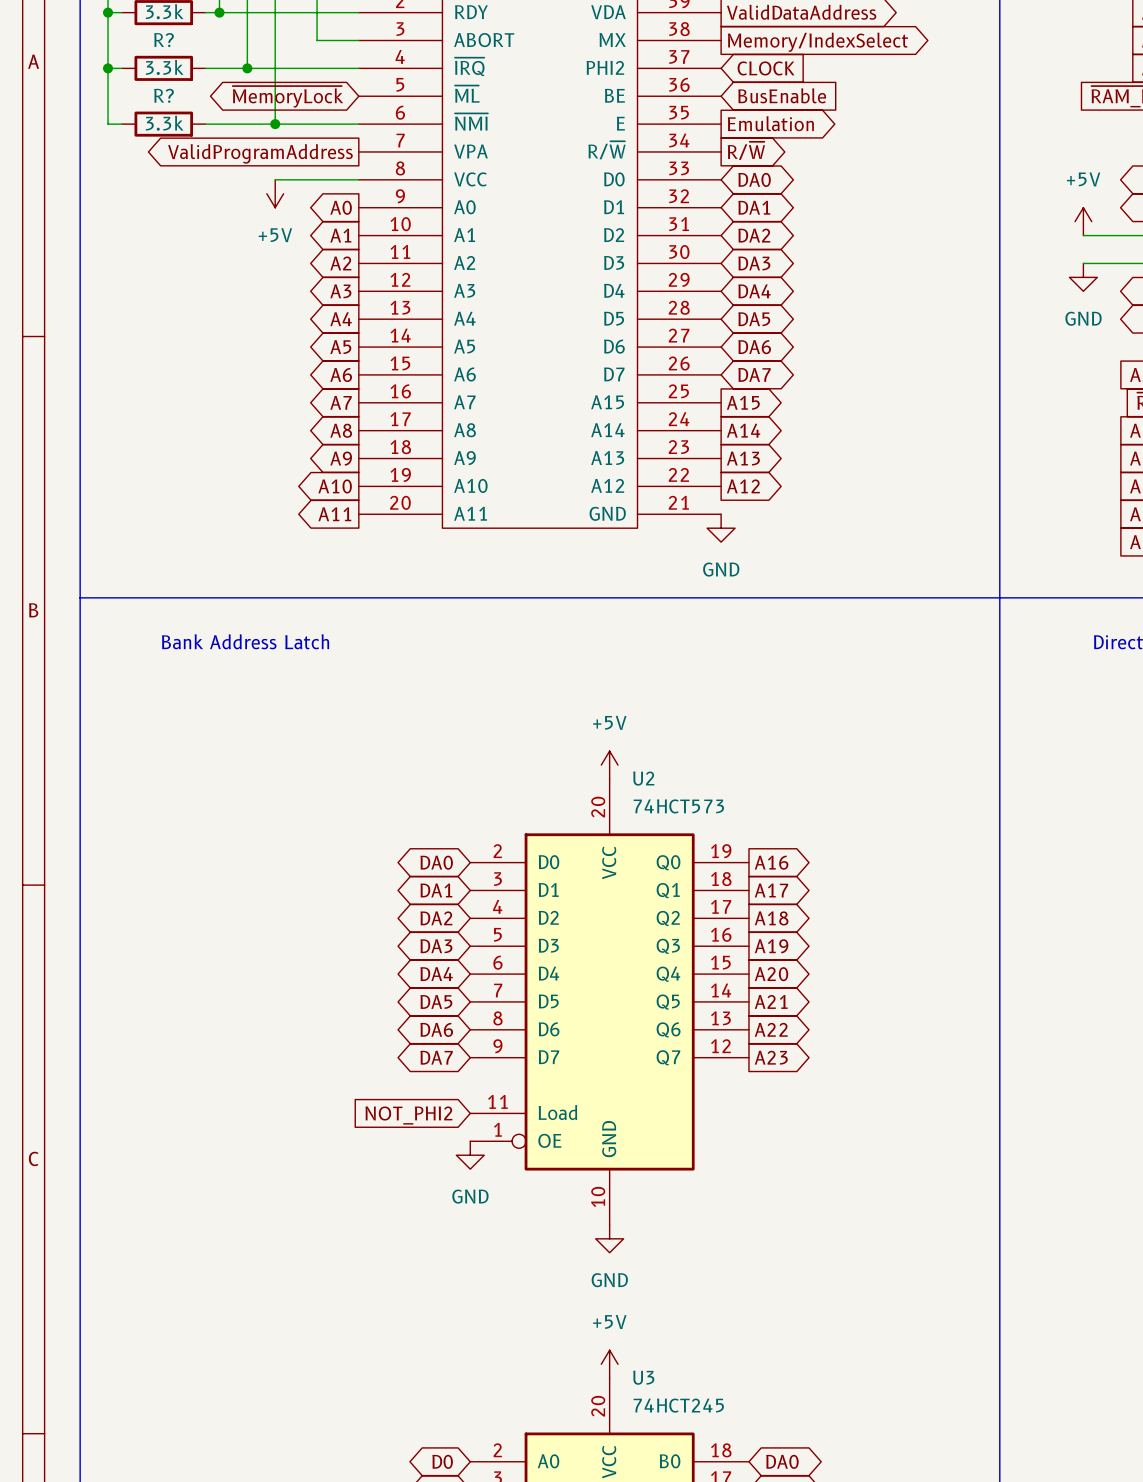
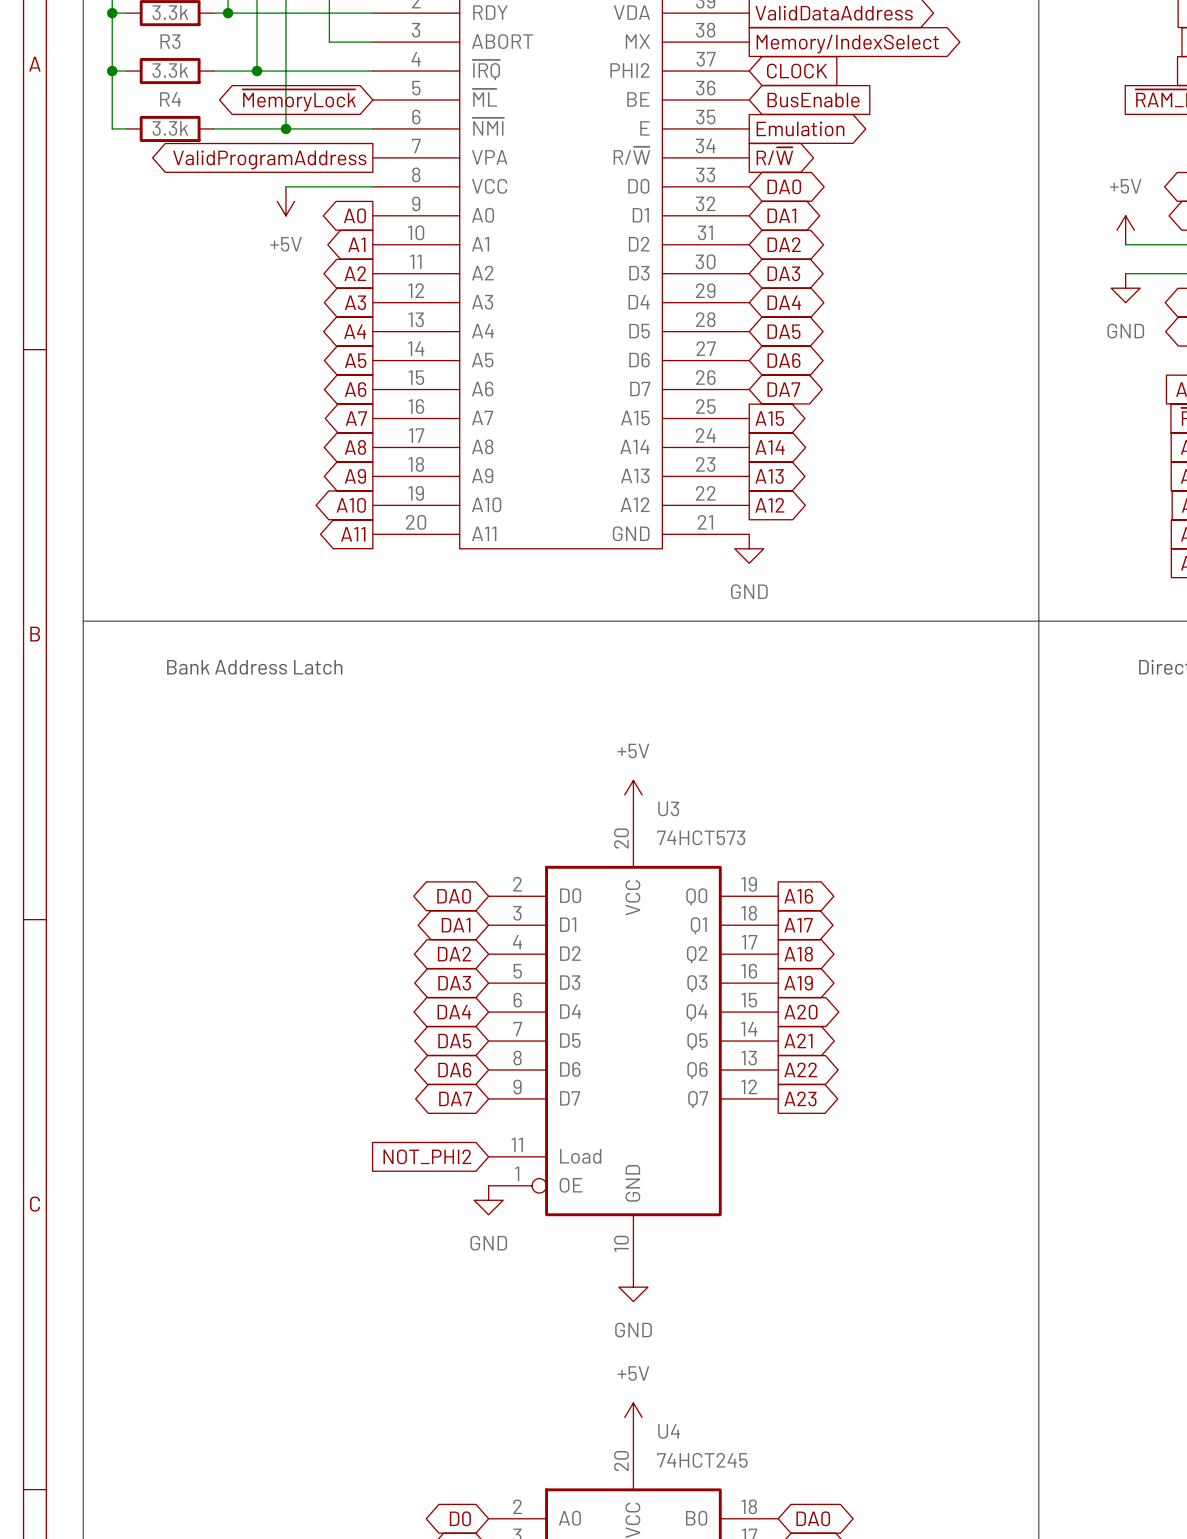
R? name: R? (164, 40) -> R3 (170, 41)
R? name: R? (164, 95) -> R4 (170, 99)
U2 name: U2 (643, 778) -> U3 (668, 808)
U3 name: U3 (643, 1377) -> U4 (669, 1431)

